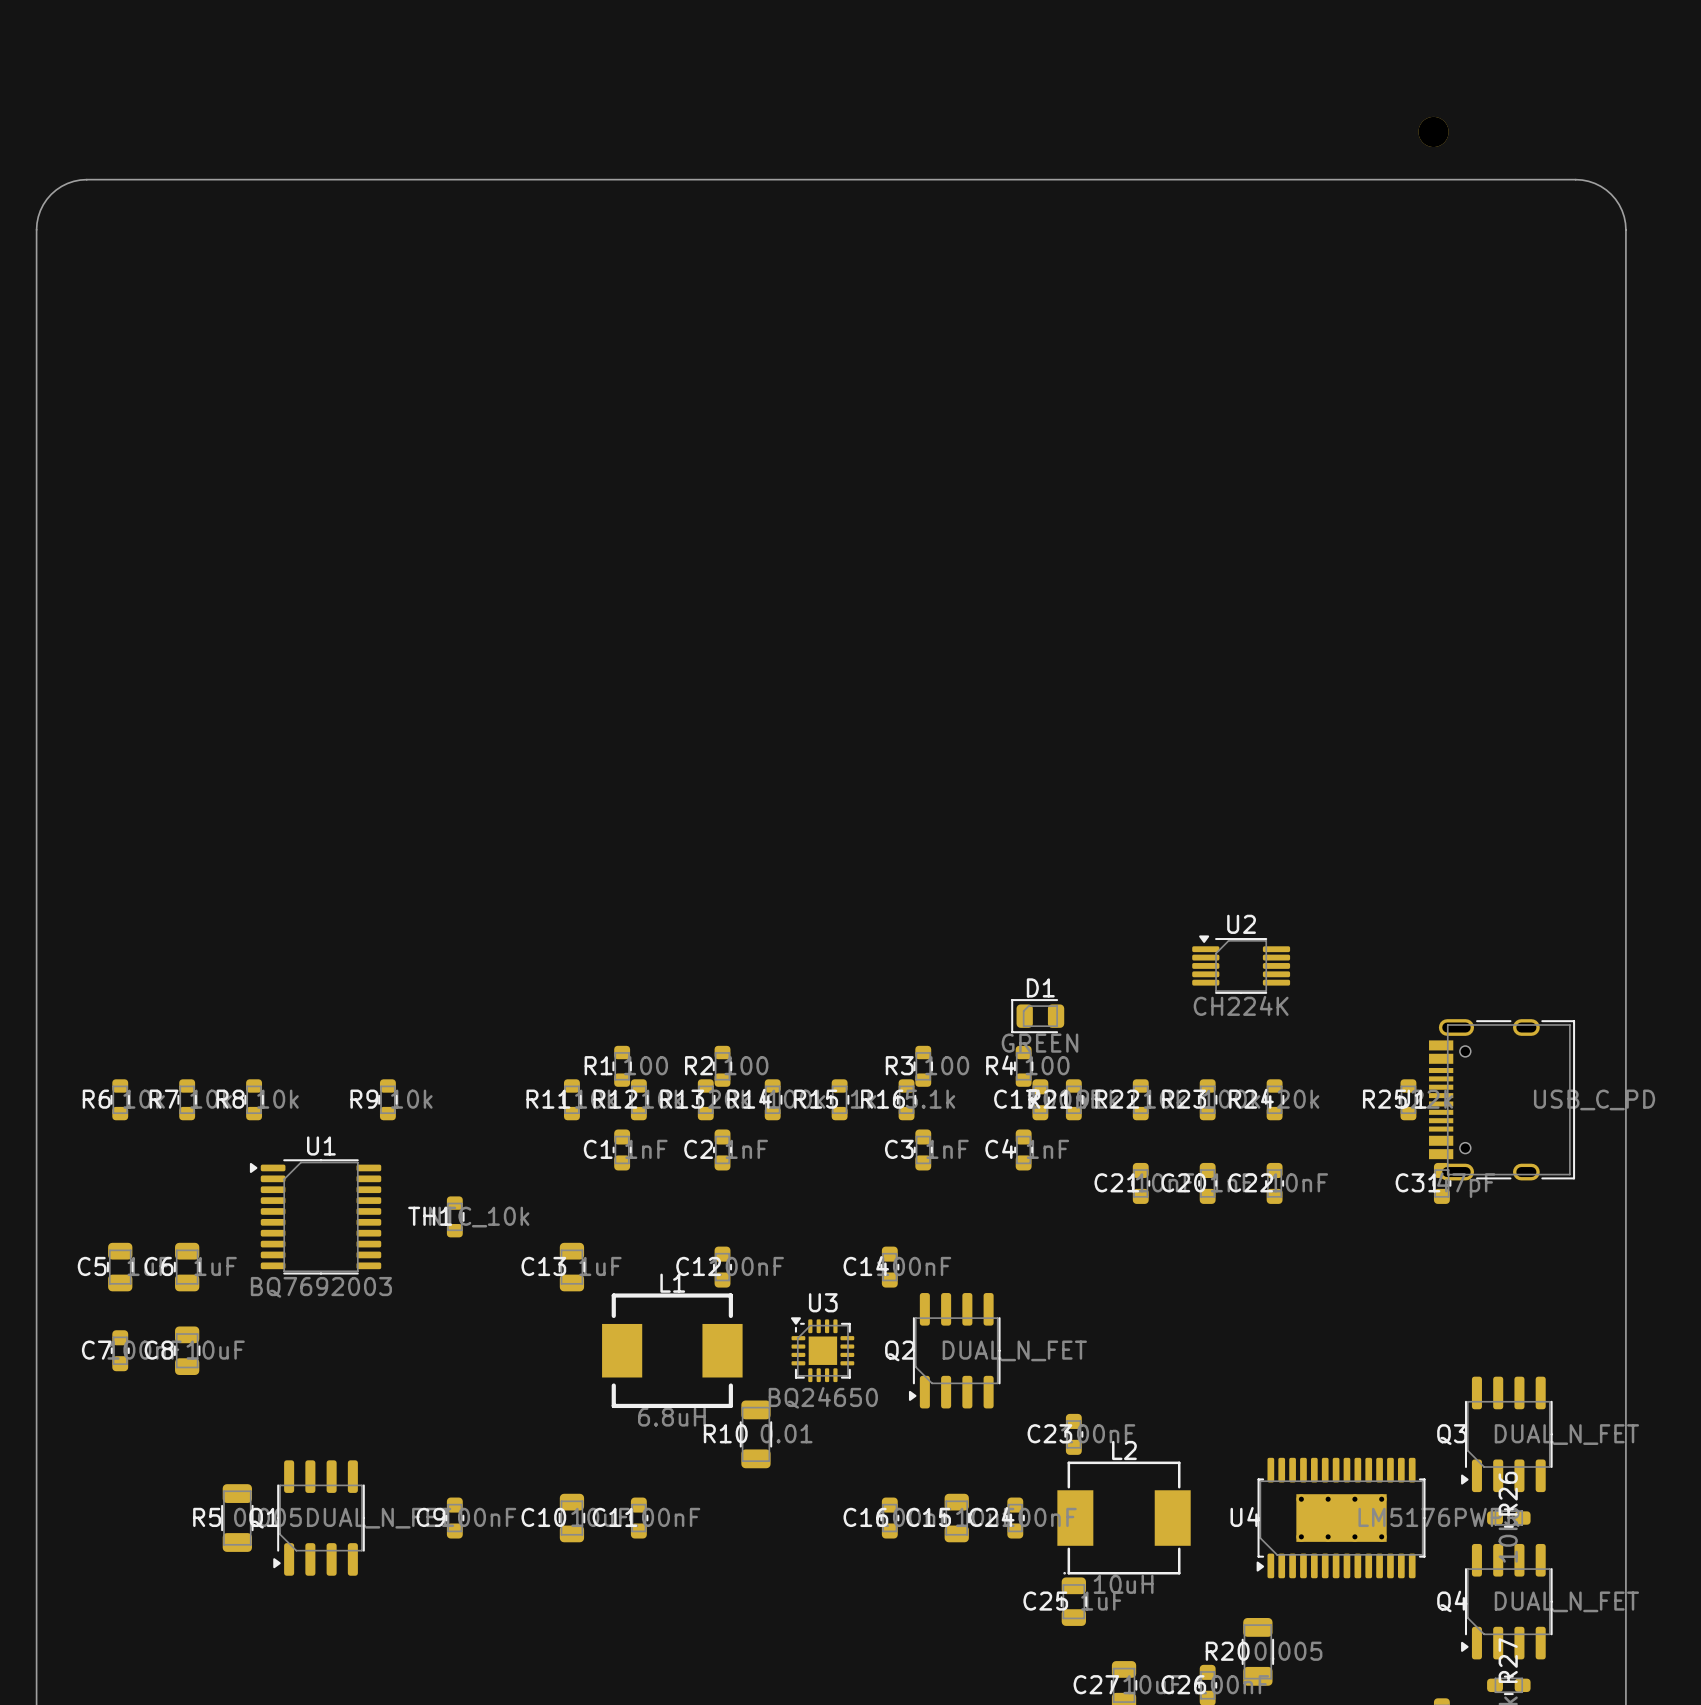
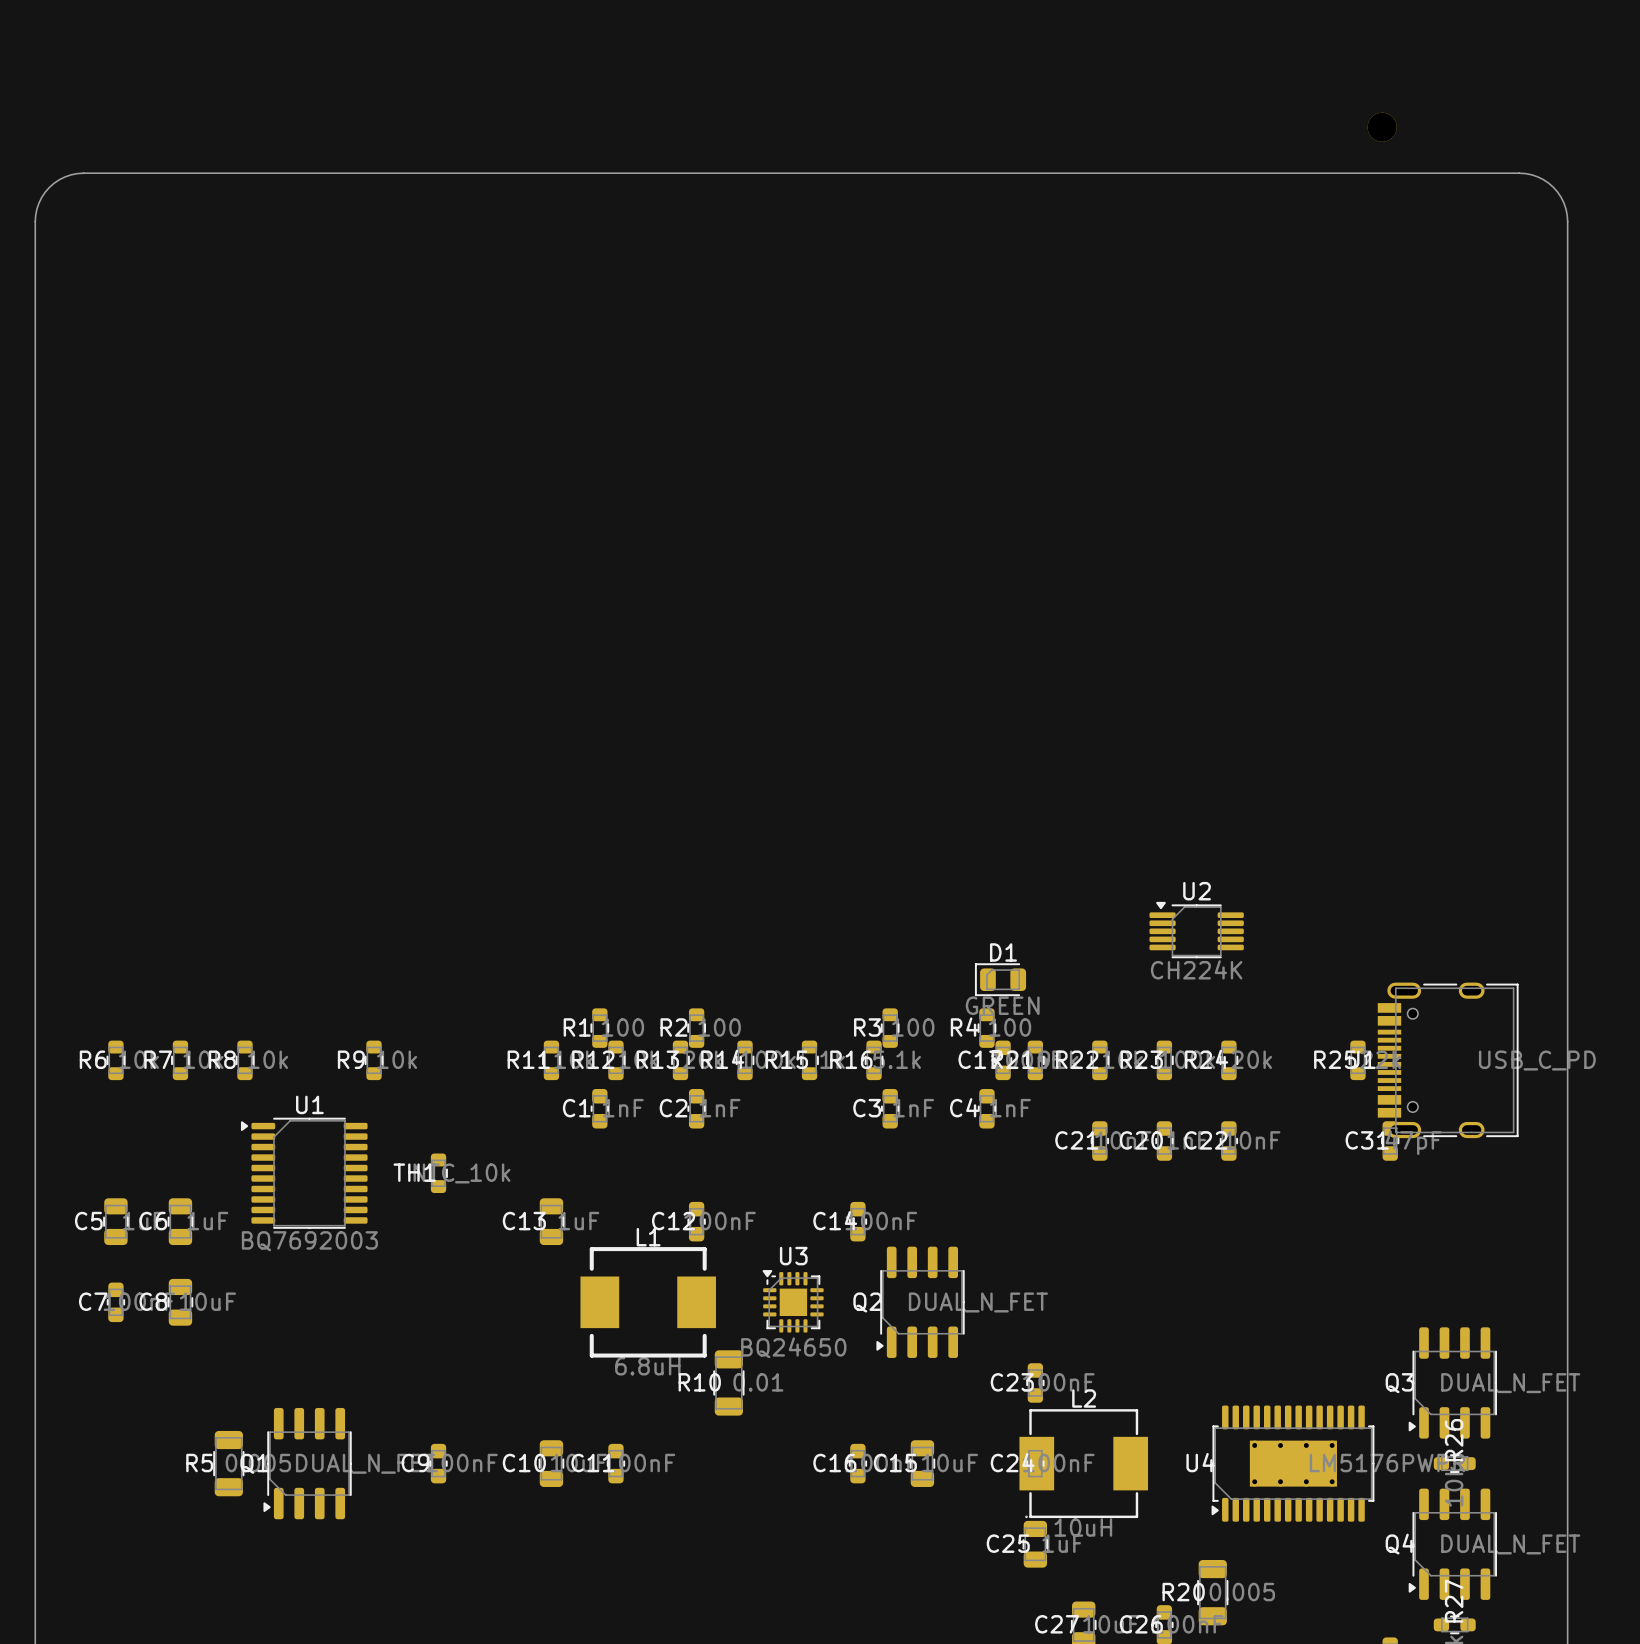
C24 position: (1015, 1518) -> (1035, 1463)

